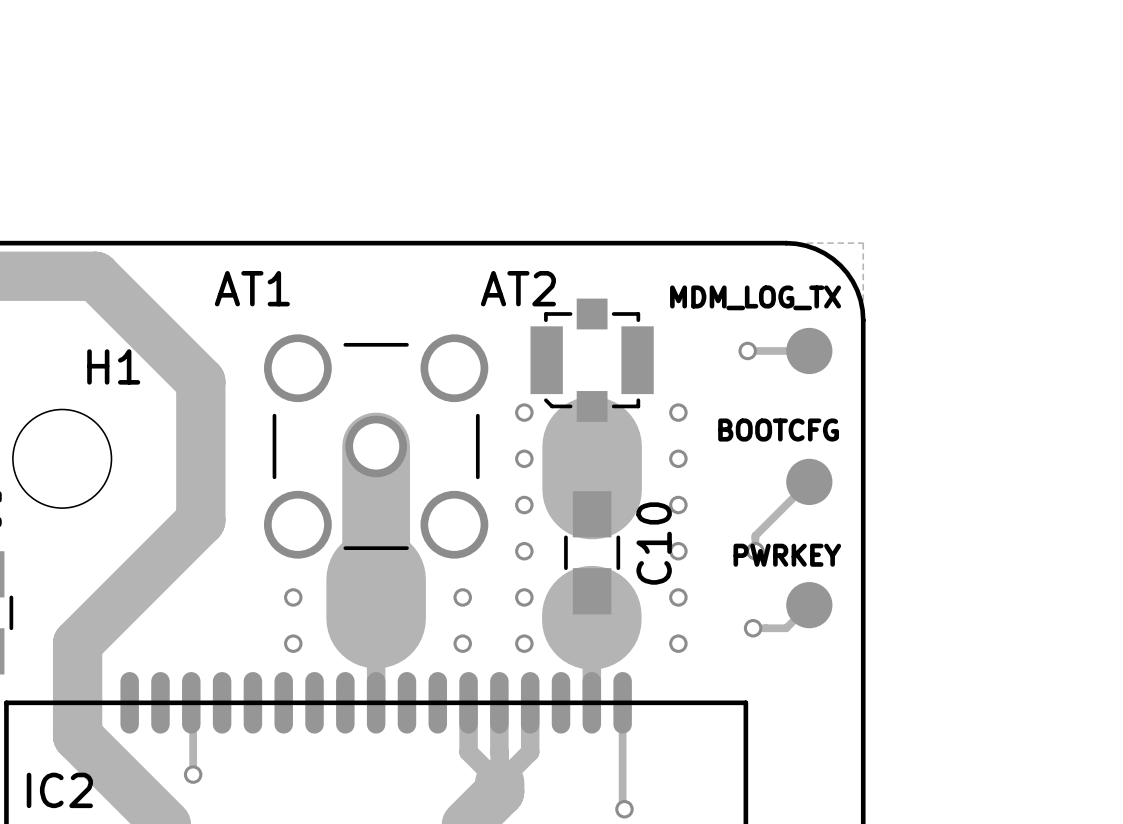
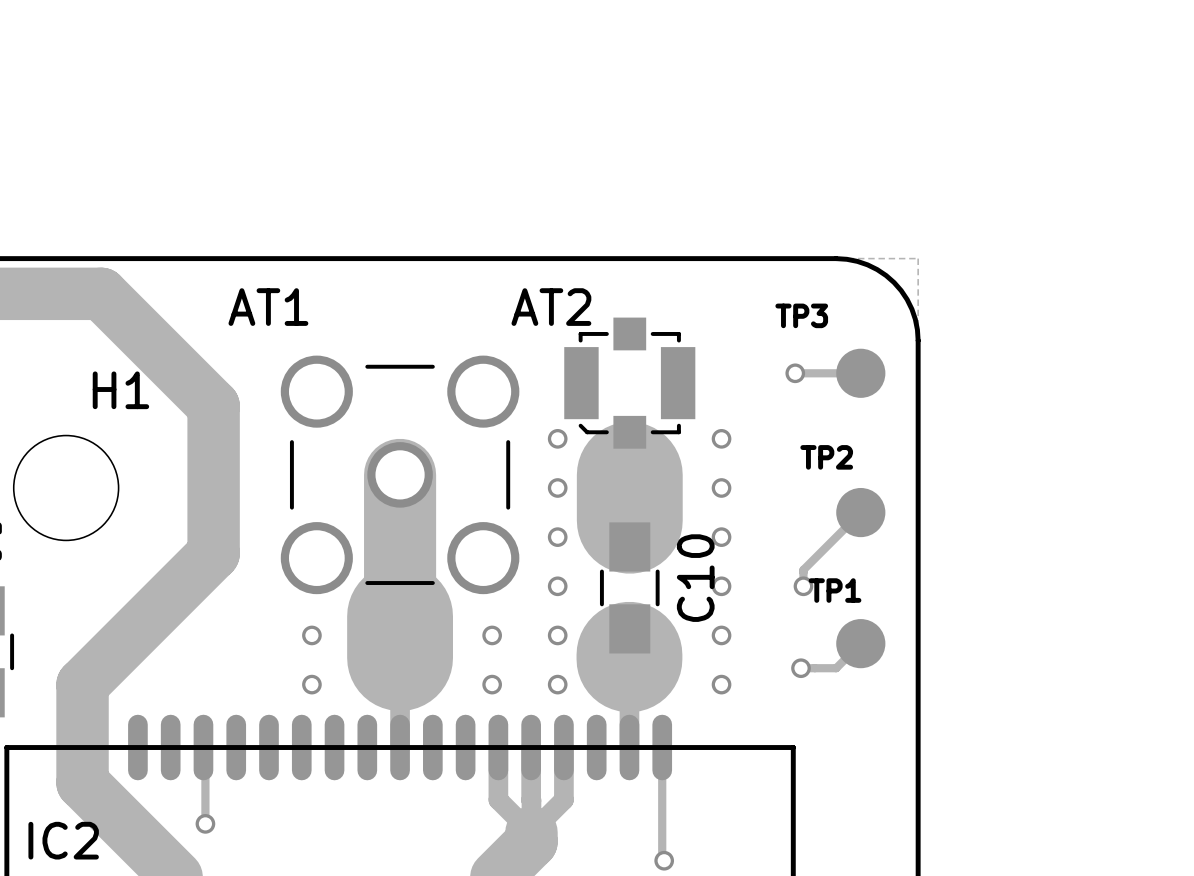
MDM_LOG_TX name: MDM_LOG_TX (755, 297) -> TP3 (801, 315)
BOOTCFG name: BOOTCFG (778, 430) -> TP2 (826, 457)
PWRKEY name: PWRKEY (787, 555) -> TP1 (835, 590)

